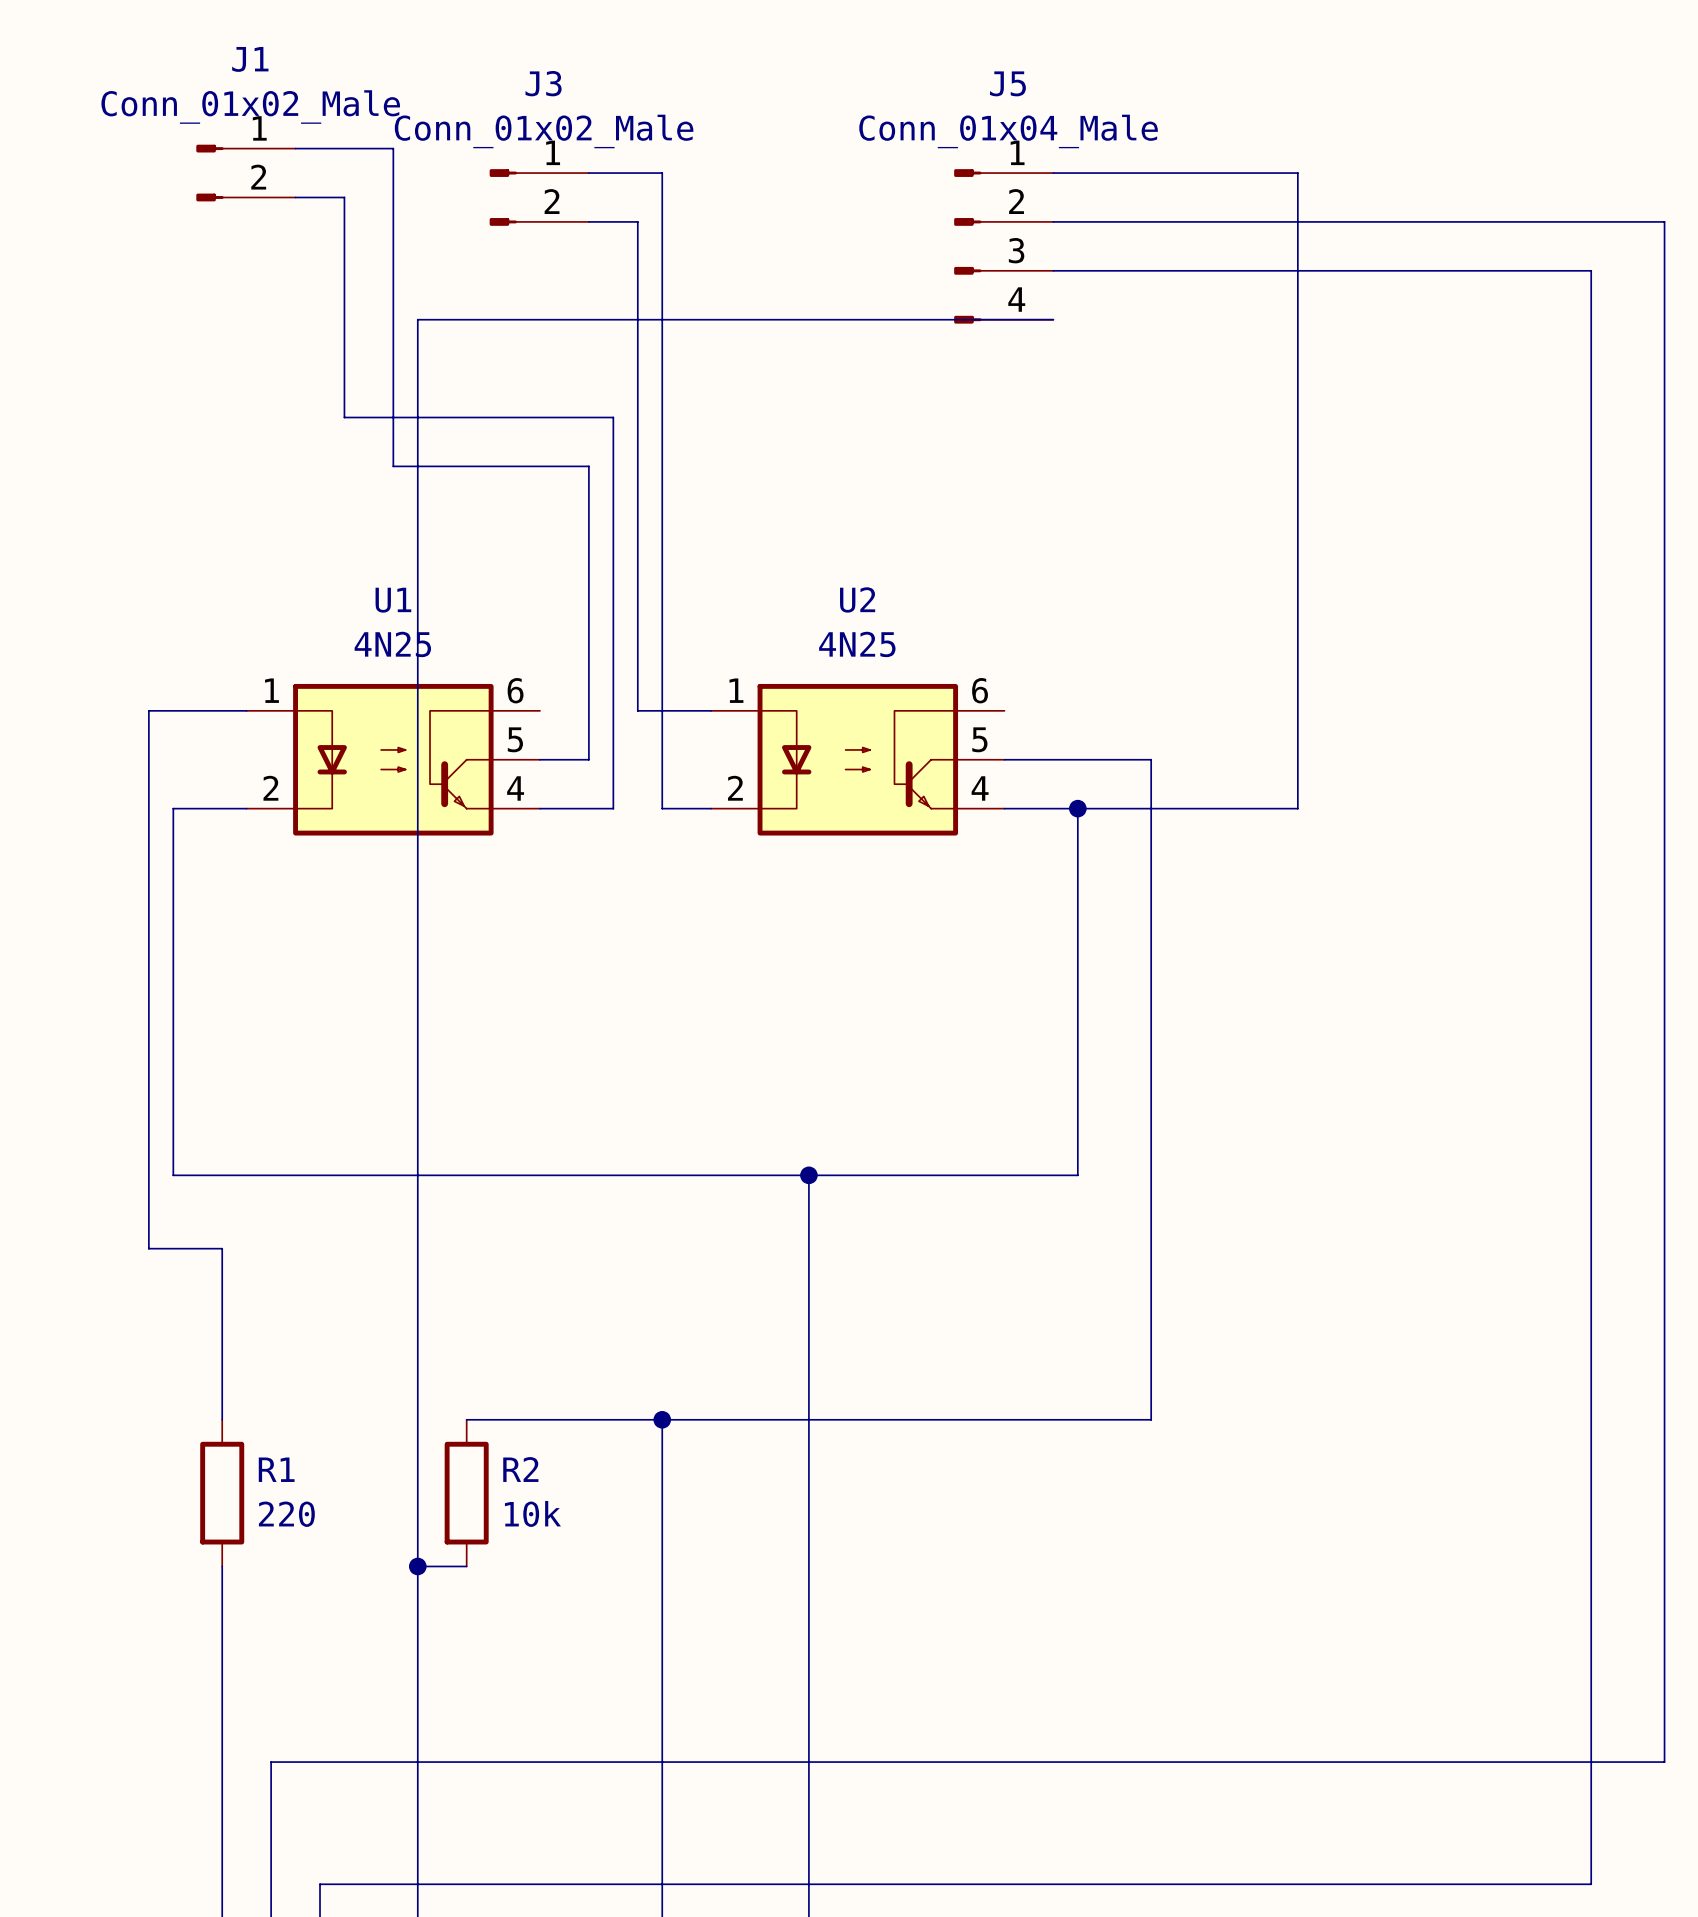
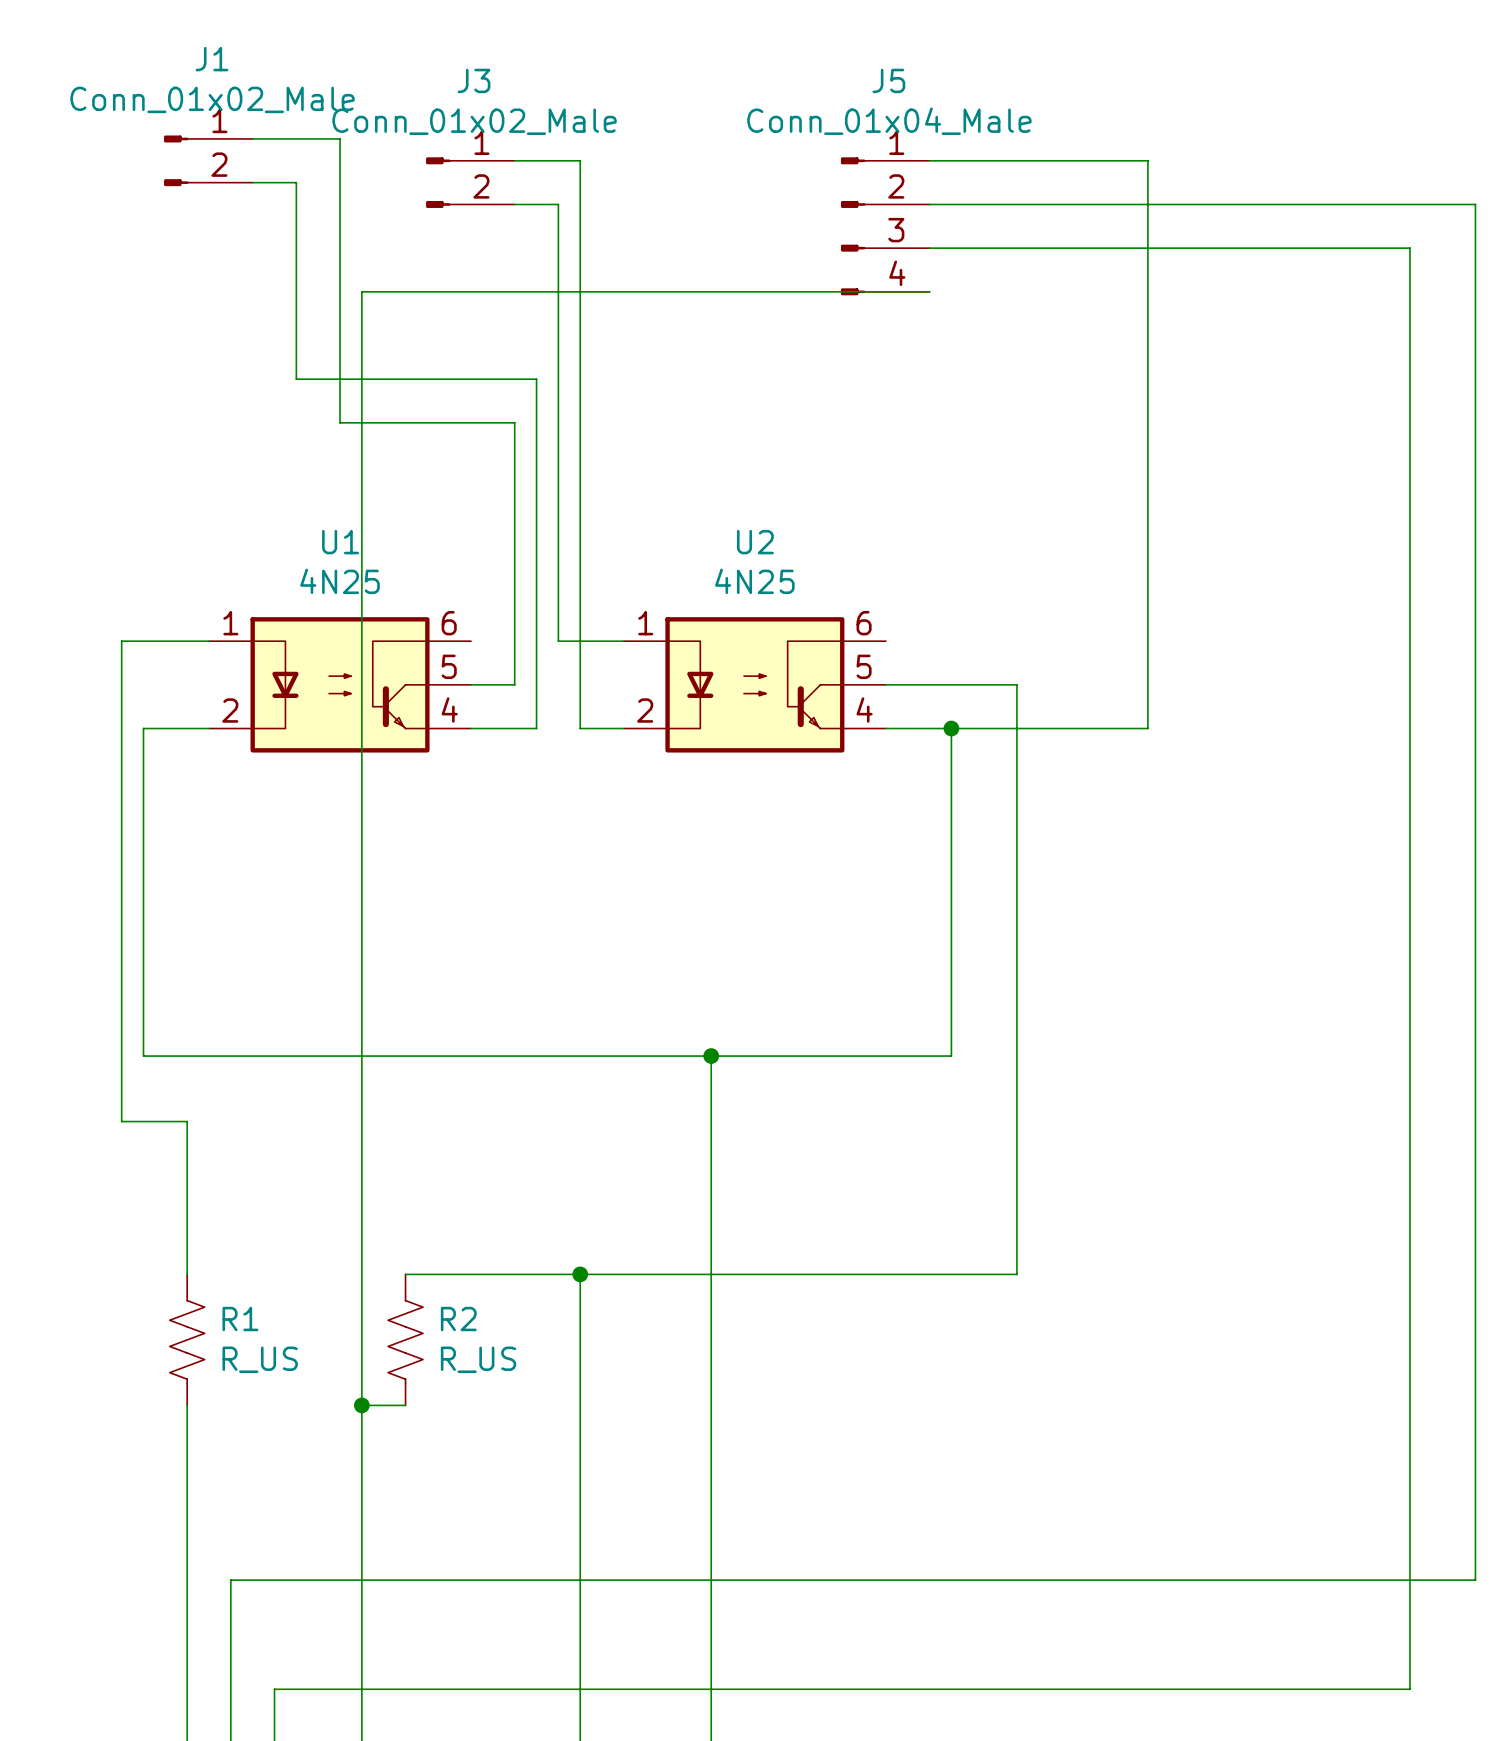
R1 symbol: [200, 1419, 245, 1567] -> [169, 1274, 205, 1406]
R2 symbol: [444, 1419, 489, 1567] -> [388, 1274, 424, 1406]
R2 value: 10k (532, 1513) -> R_US (478, 1359)
R1 value: 220 (286, 1514) -> R_US (260, 1359)

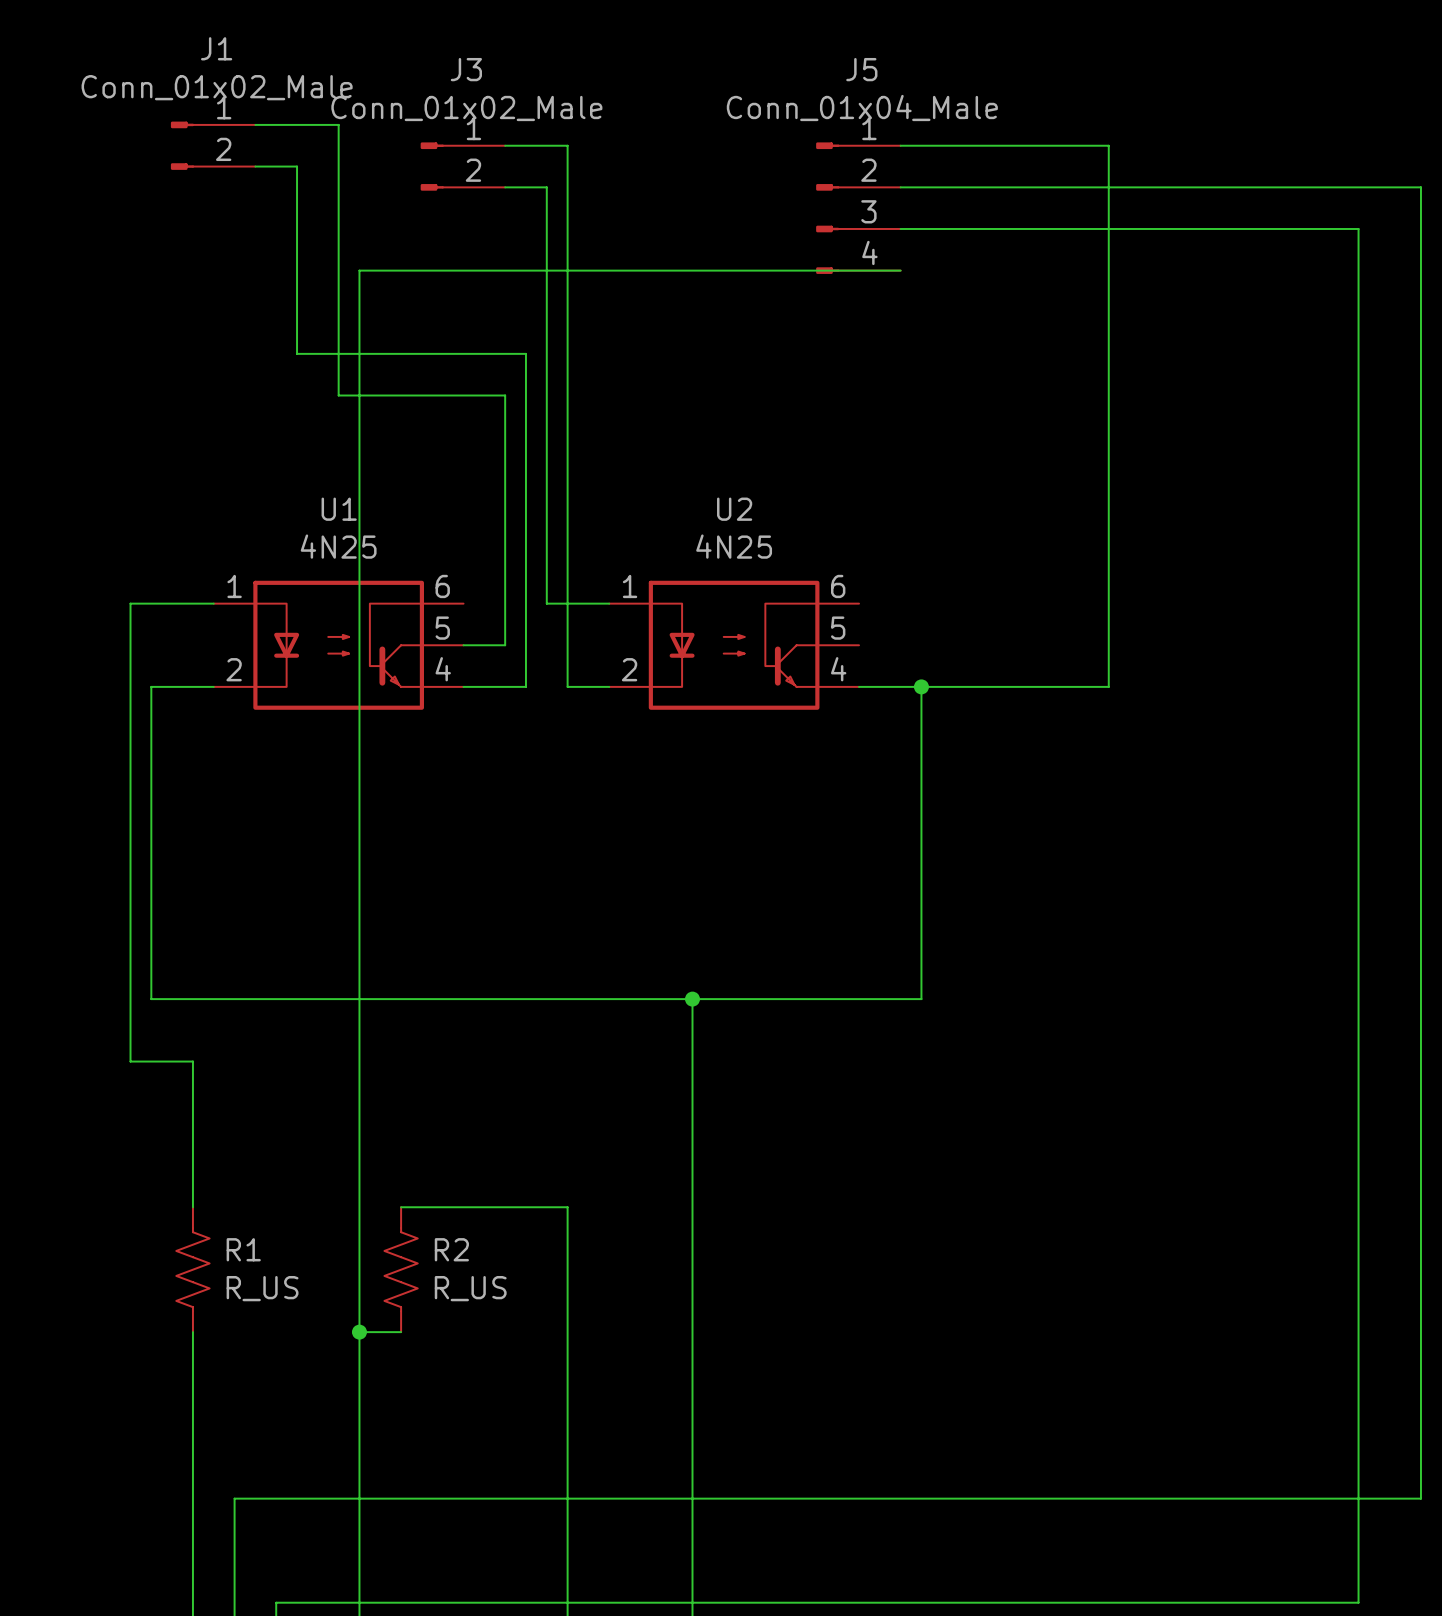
wire: (885, 684) (1016, 684) (1016, 1274) (580, 1274) -> none
junction: (580, 1274) -> none

